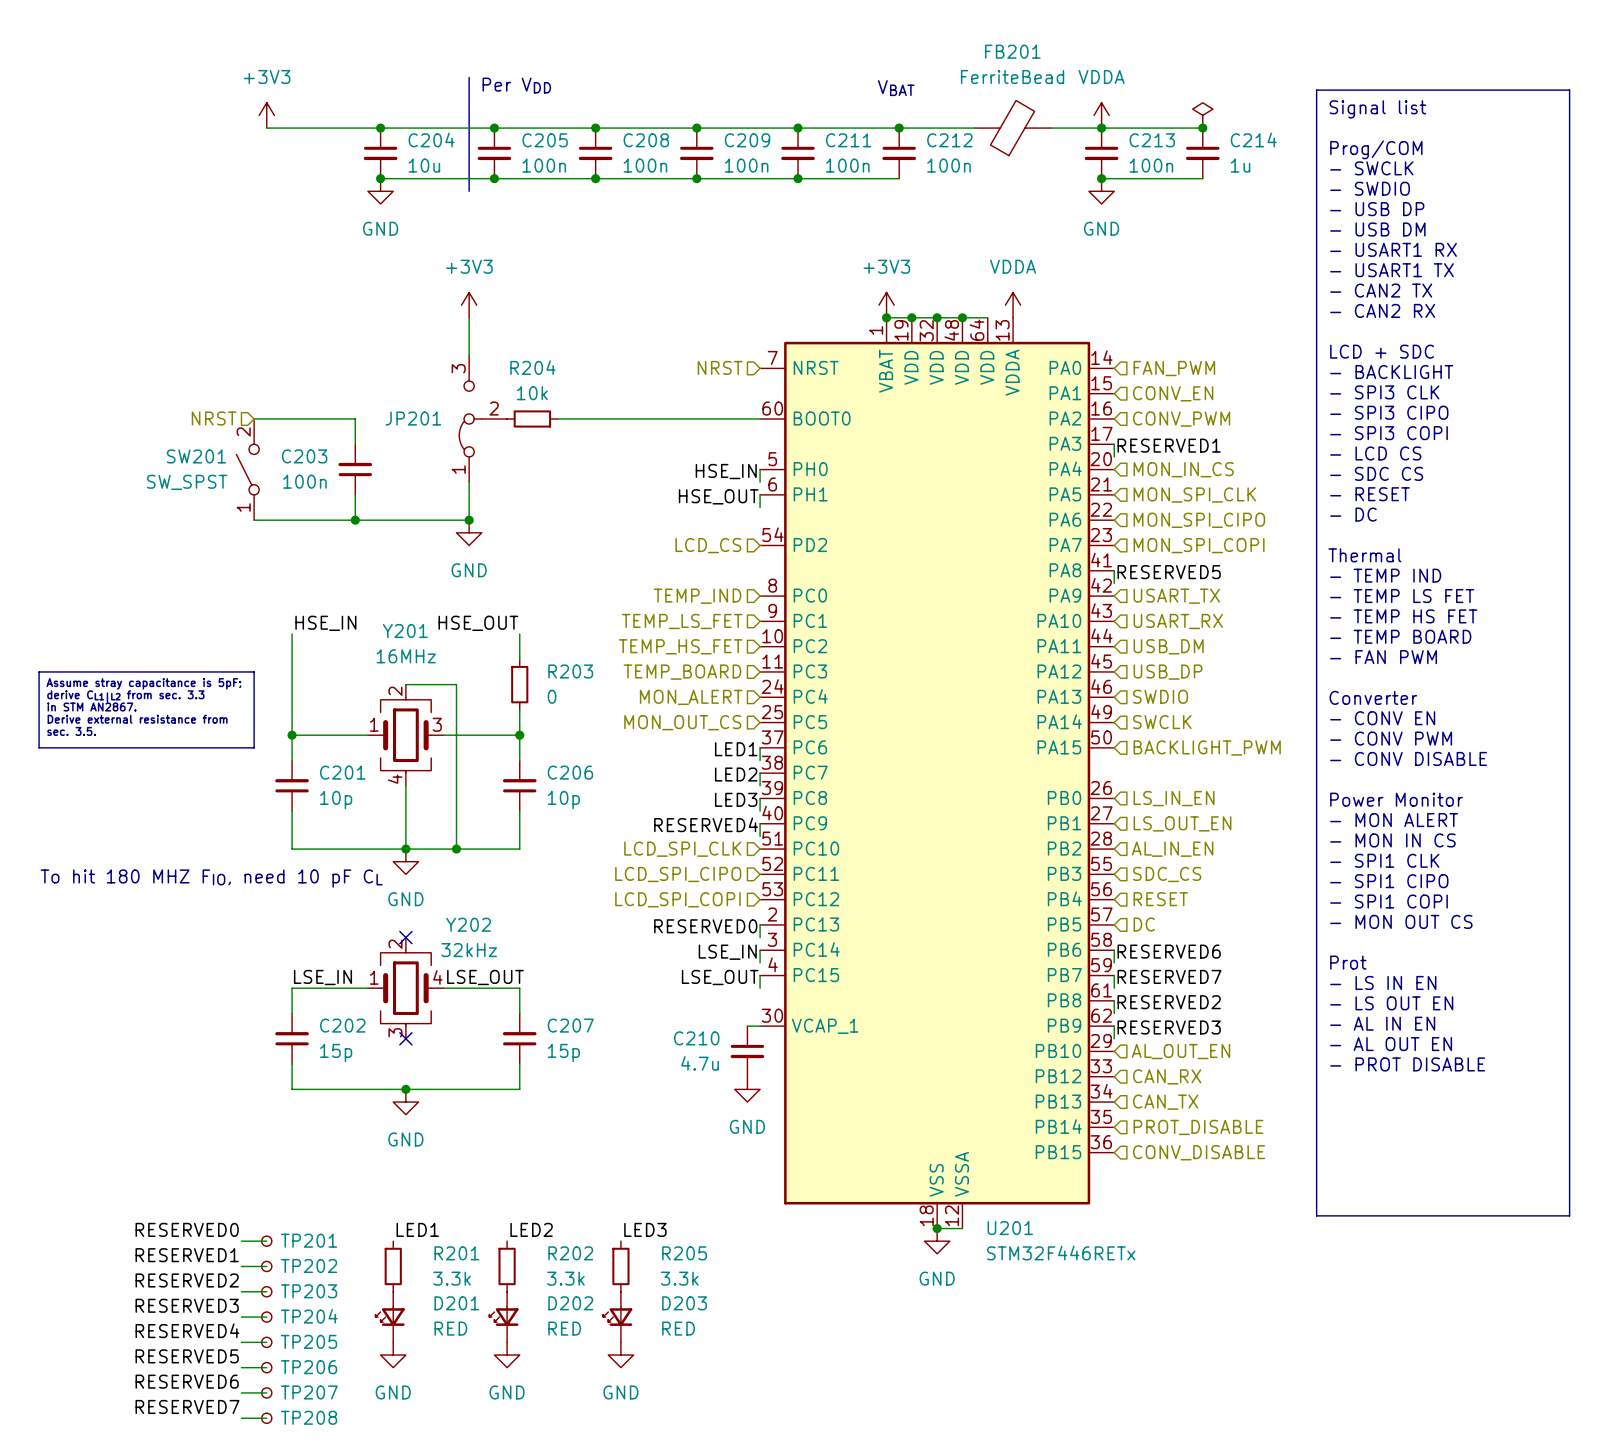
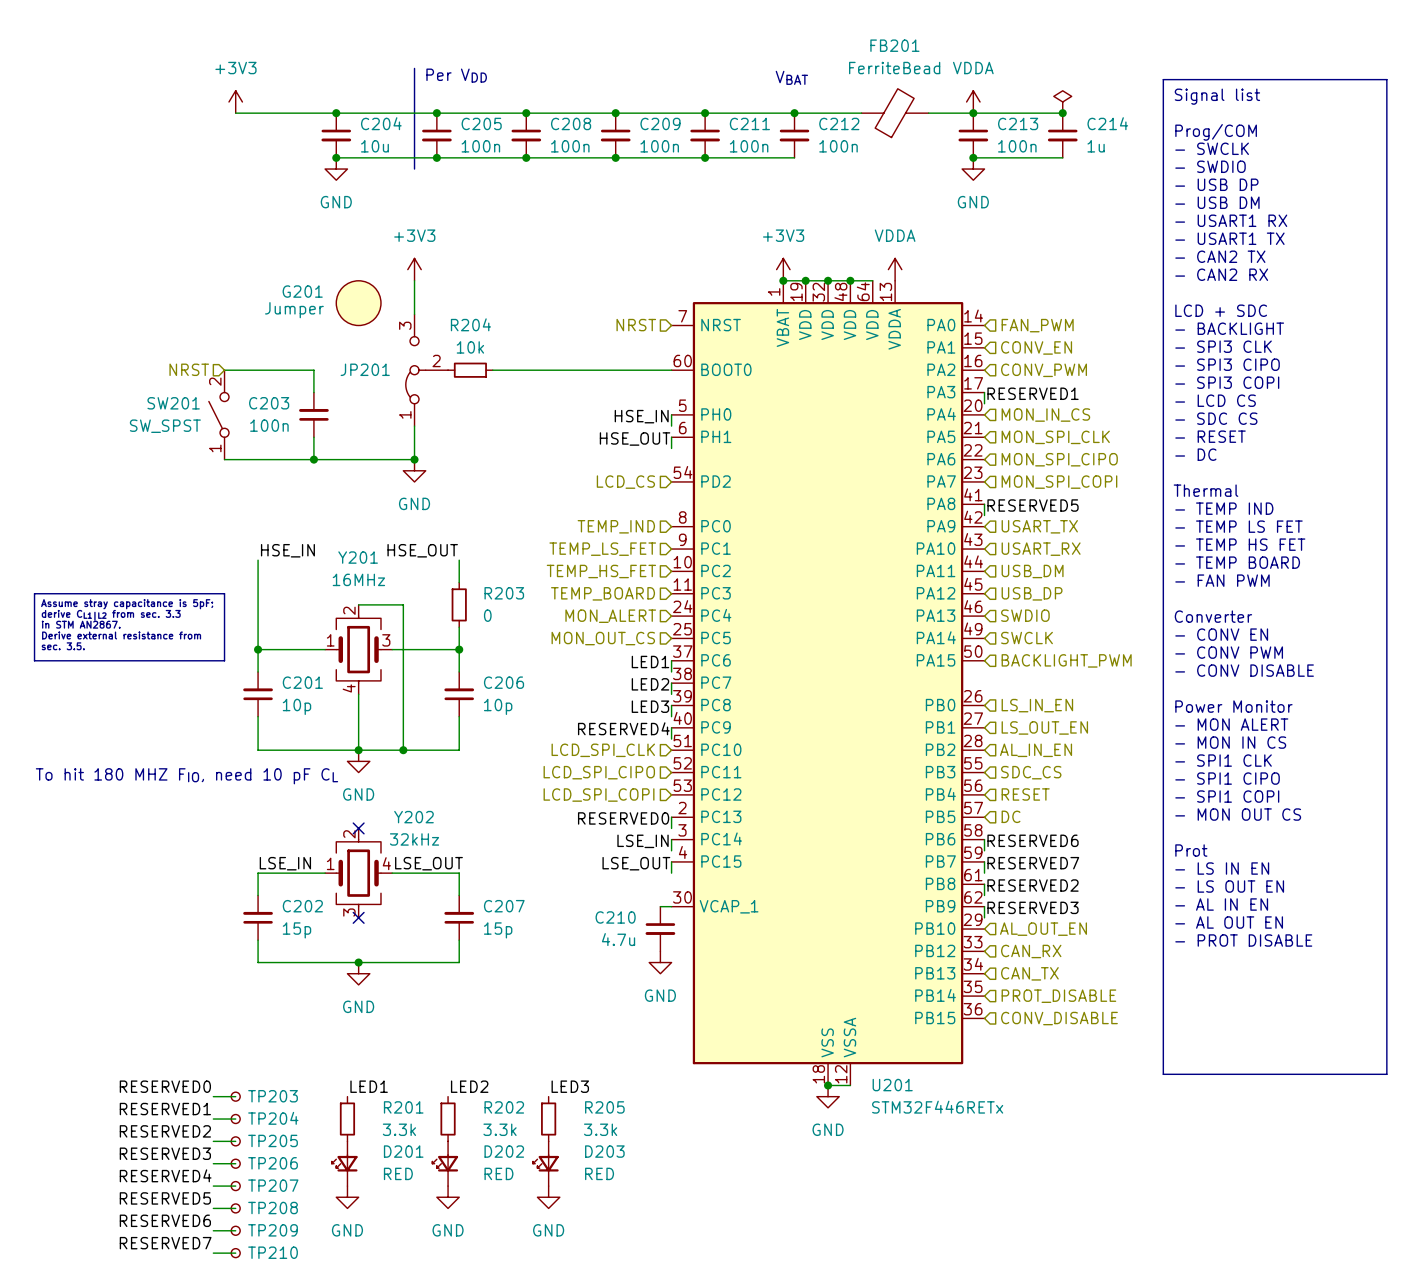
G201: none -> Jumper (358, 303)
TP201 name: TP201 (309, 1240) -> TP203 (273, 1096)
TP202 name: TP202 (309, 1265) -> TP204 (273, 1118)
TP203 name: TP203 (309, 1291) -> TP205 (273, 1140)
TP204 name: TP204 (309, 1316) -> TP206 (273, 1163)
TP205 name: TP205 (309, 1341) -> TP207 (273, 1185)
TP206 name: TP206 (309, 1367) -> TP208 (273, 1208)
TP207 name: TP207 (309, 1392) -> TP209 (273, 1230)
TP208 name: TP208 (309, 1417) -> TP210 (273, 1252)

